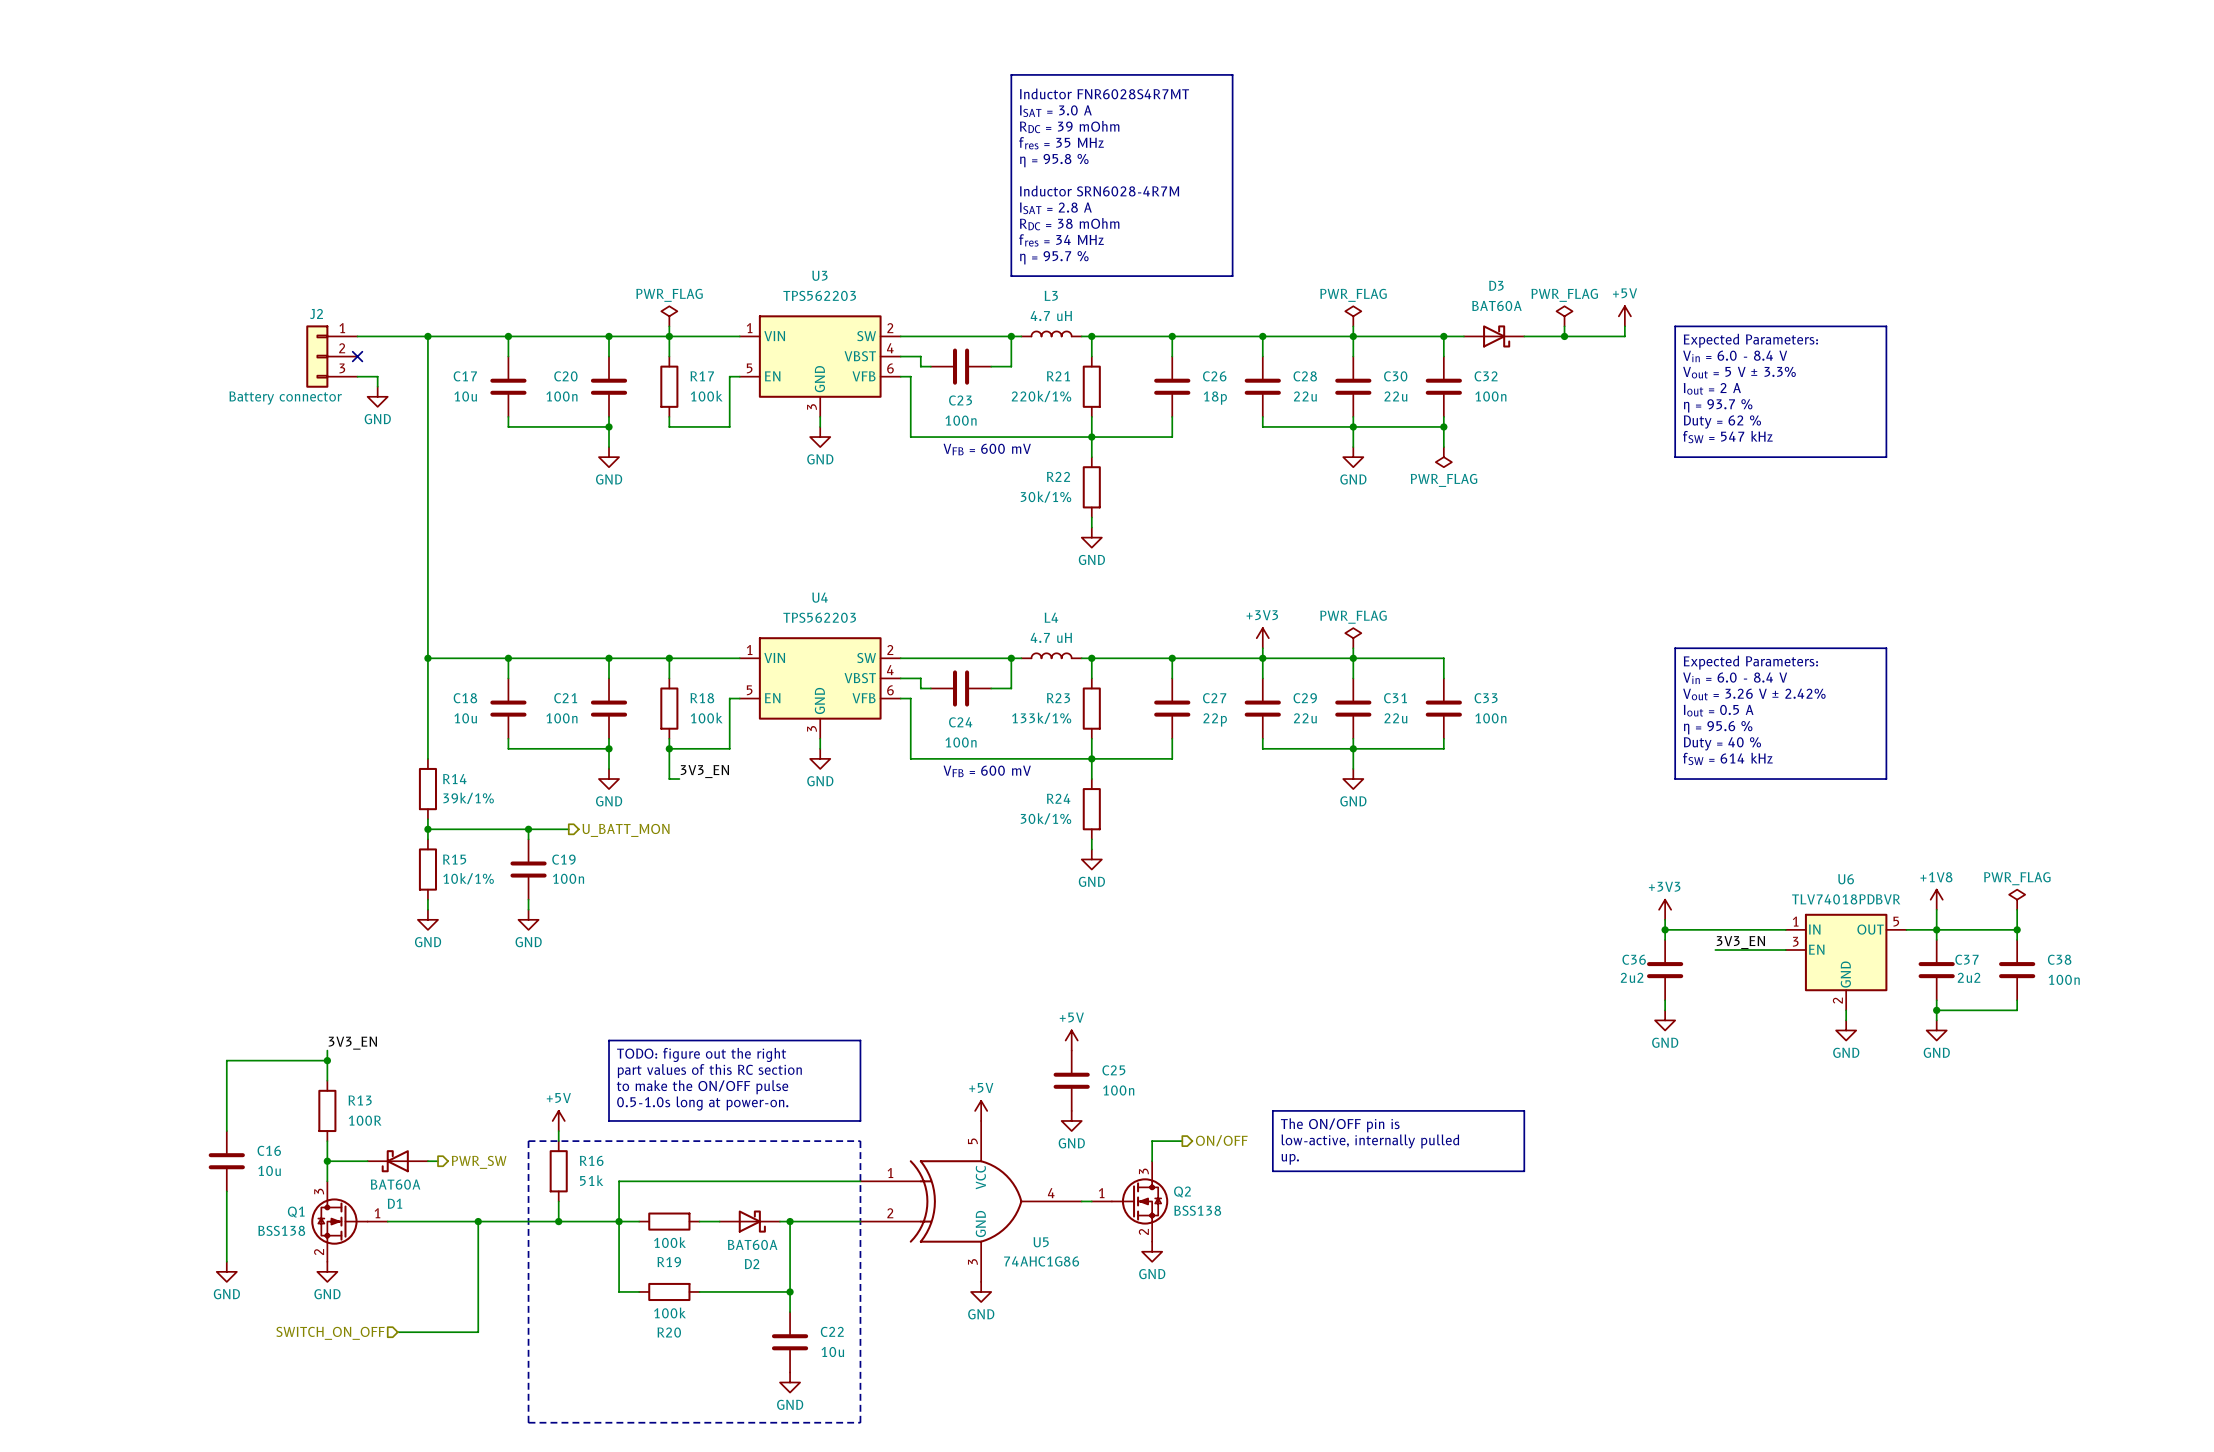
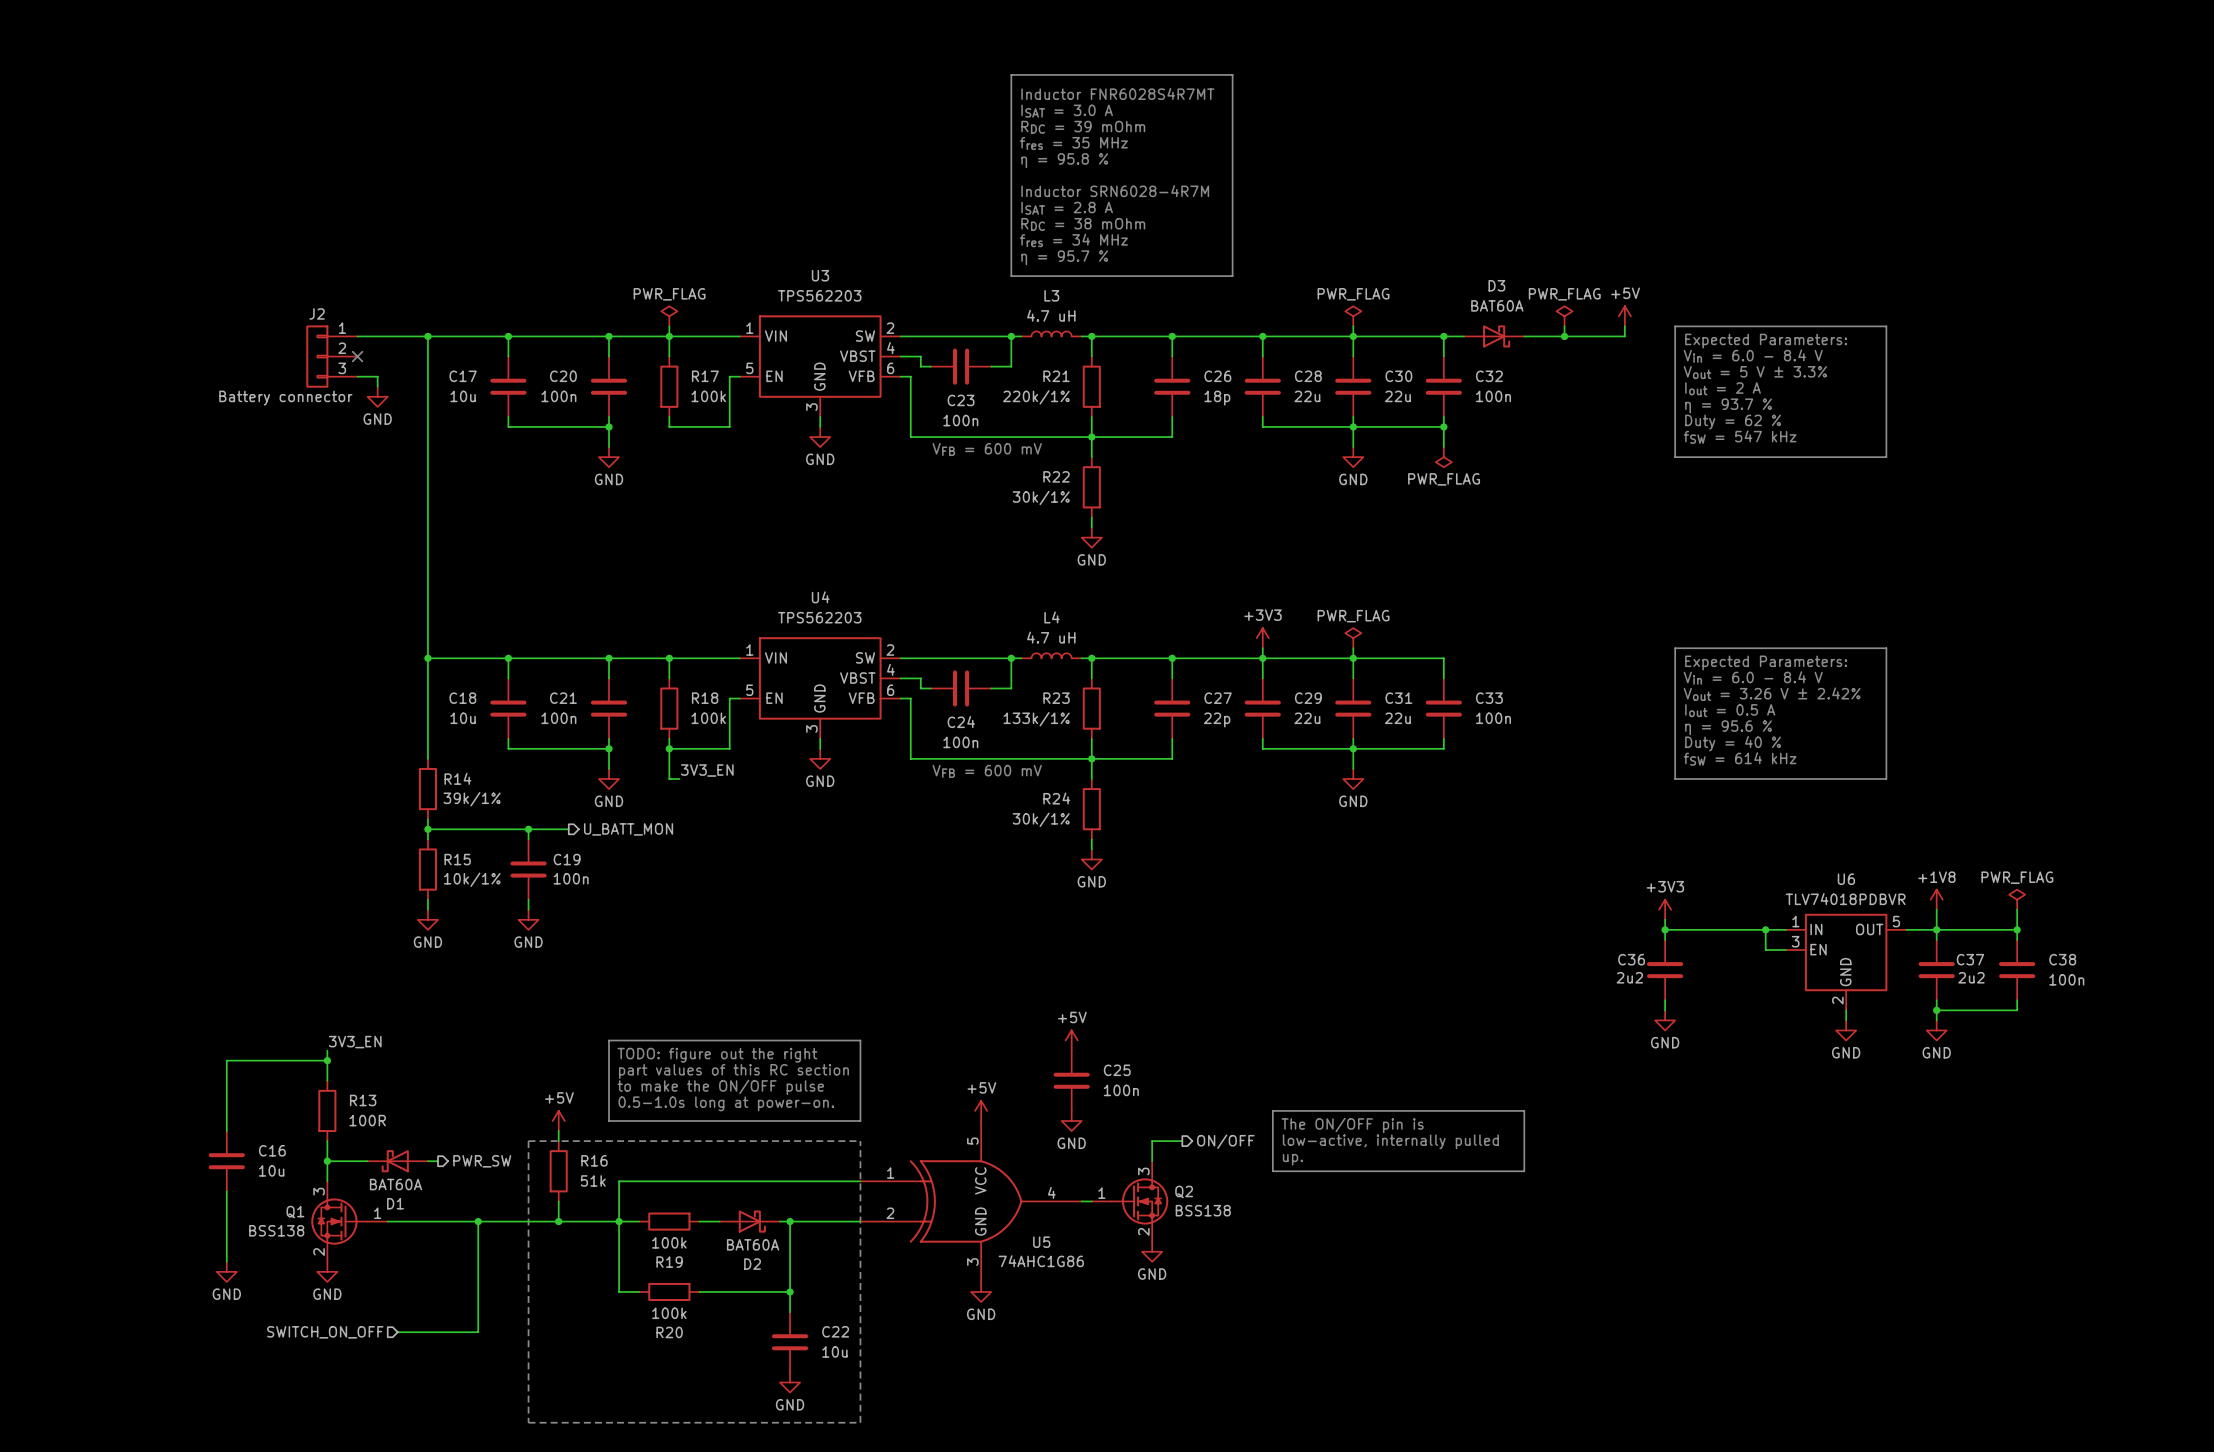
junction: none -> (1765, 929)
label: 3V3_EN (1740, 942) -> none
wire: (1715, 949) (1765, 949) -> (1765, 929) (1765, 949)

